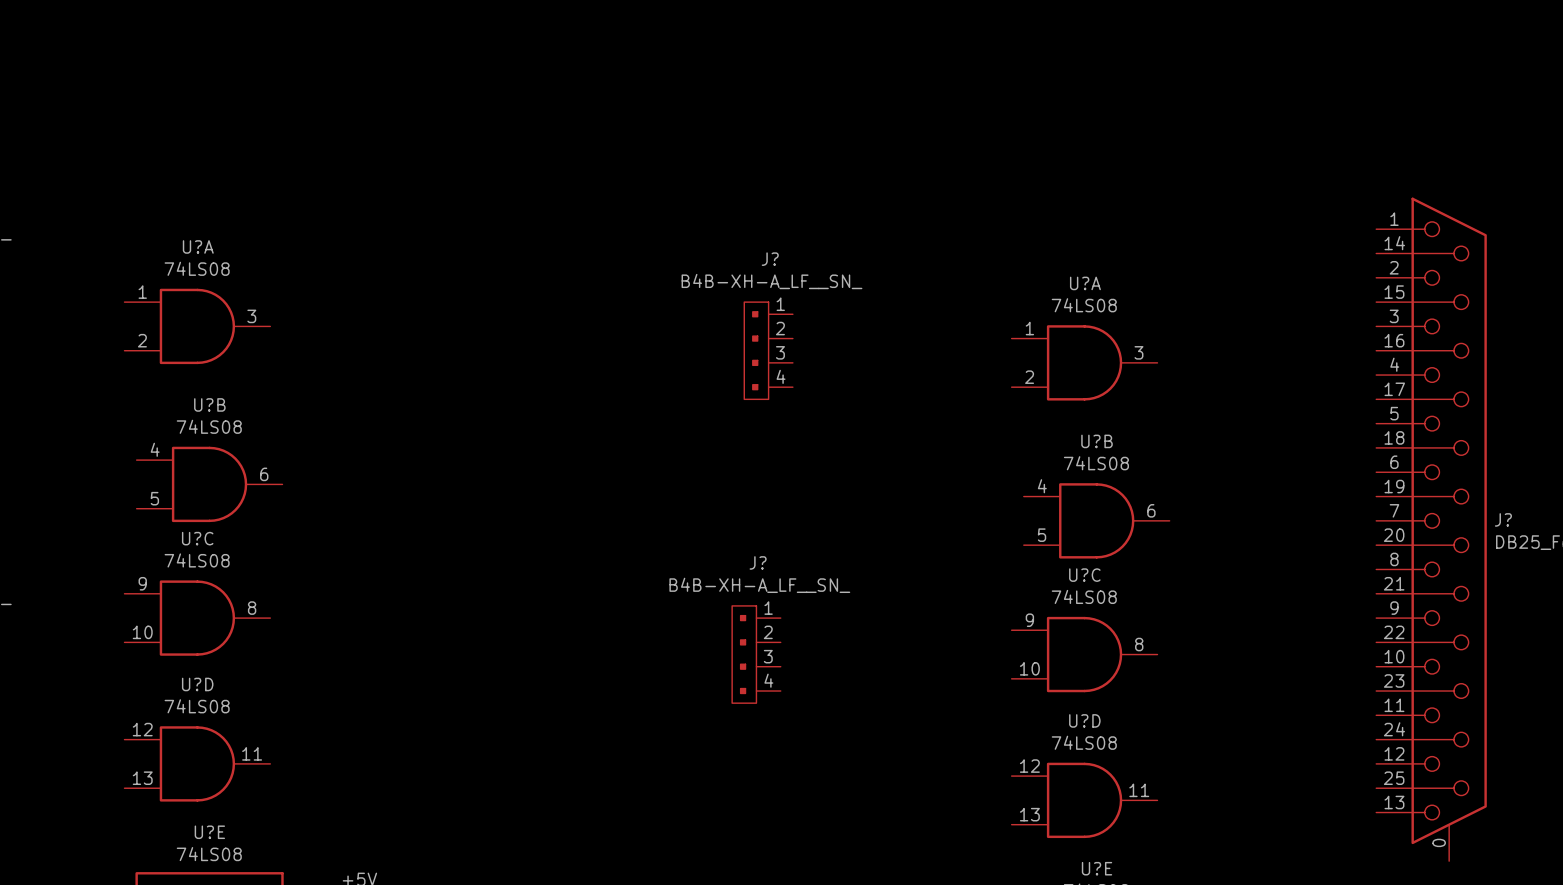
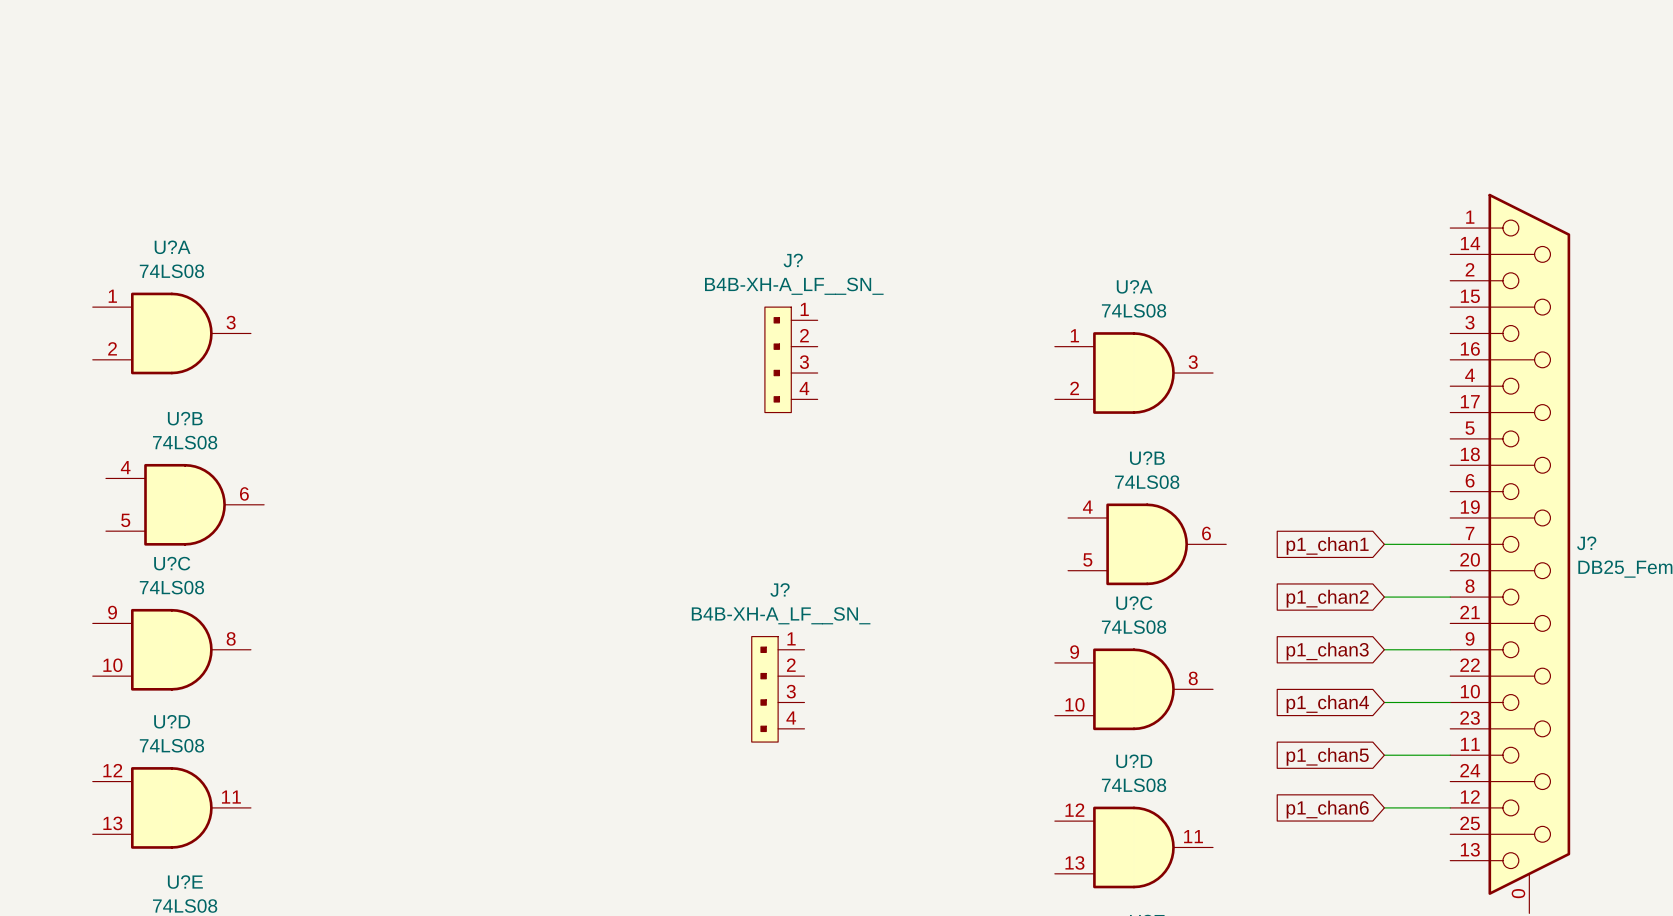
wire: none -> (1384, 544) (1450, 544)
global label: none -> p1_chan1 (1327, 545)
wire: none -> (1384, 597) (1450, 597)
global label: none -> p1_chan2 (1327, 598)
wire: none -> (1384, 649) (1450, 649)
global label: none -> p1_chan3 (1327, 651)
wire: none -> (1384, 702) (1450, 702)
global label: none -> p1_chan4 (1327, 704)
wire: none -> (1384, 755) (1450, 755)
global label: none -> p1_chan5 (1327, 756)
wire: none -> (1384, 807) (1450, 807)
global label: none -> p1_chan6 (1327, 809)

